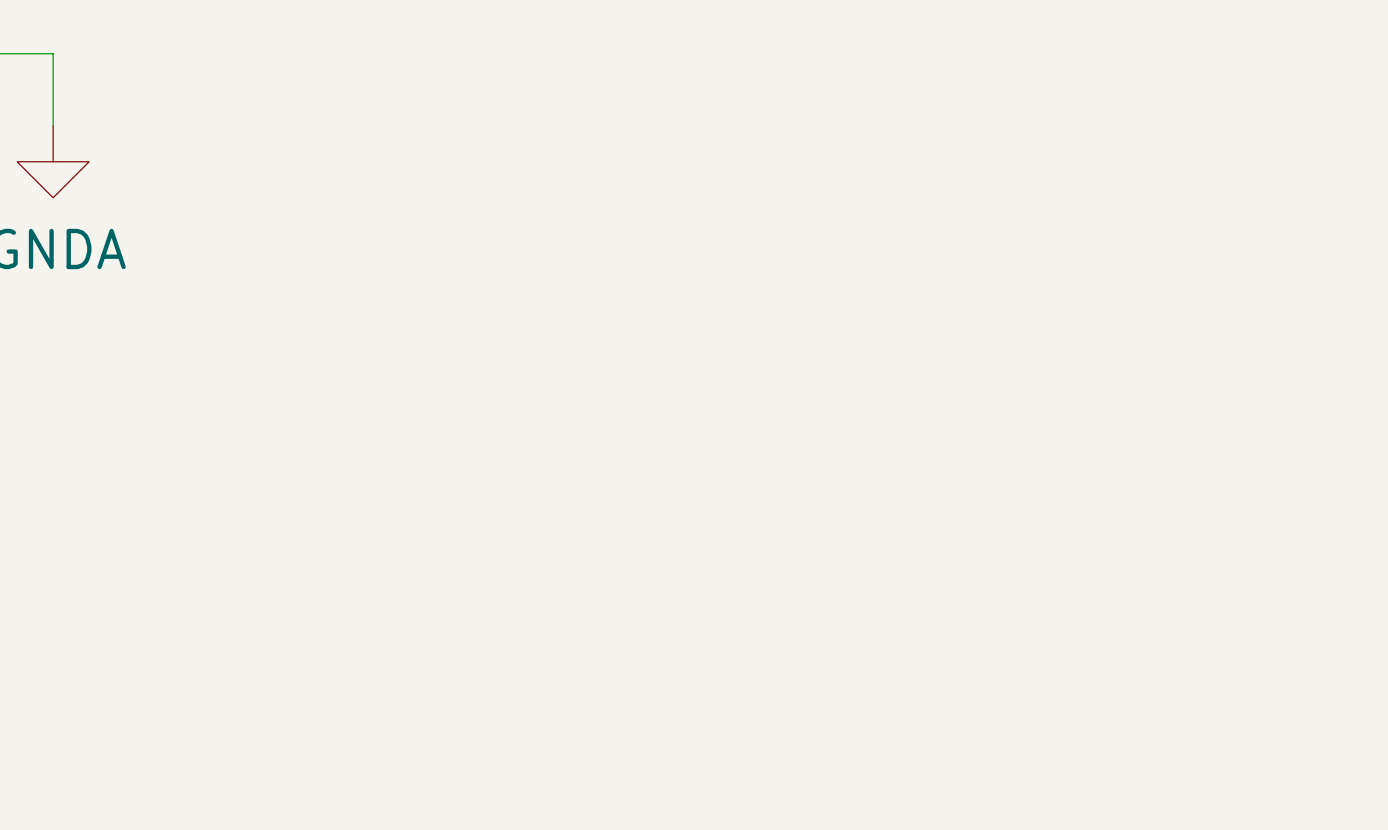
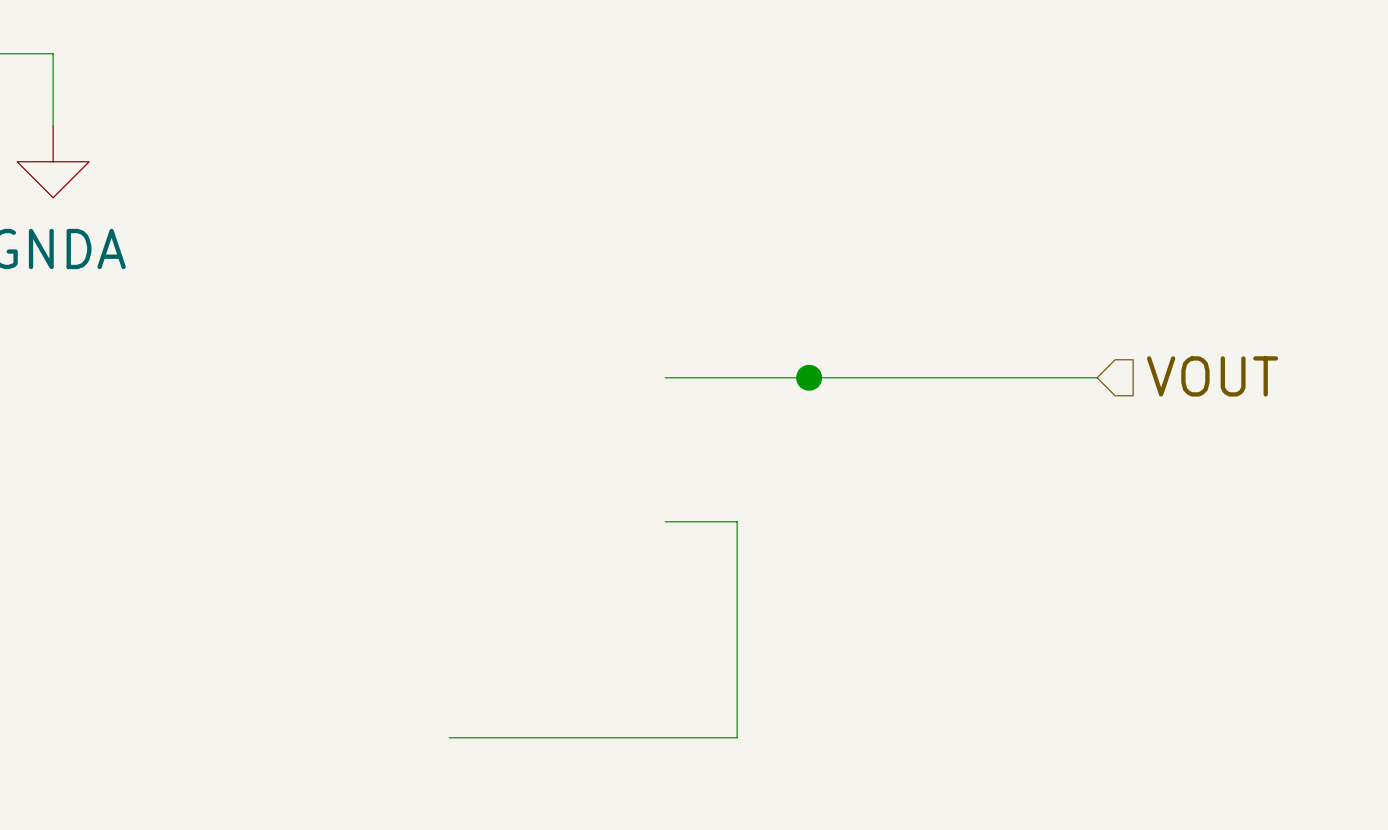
hierarchical label: none -> VOUT (1212, 376)
wire: none -> (665, 377) (1097, 377)
junction: none -> (809, 377)
wire: none -> (665, 521) (737, 521) (737, 737) (449, 737)

